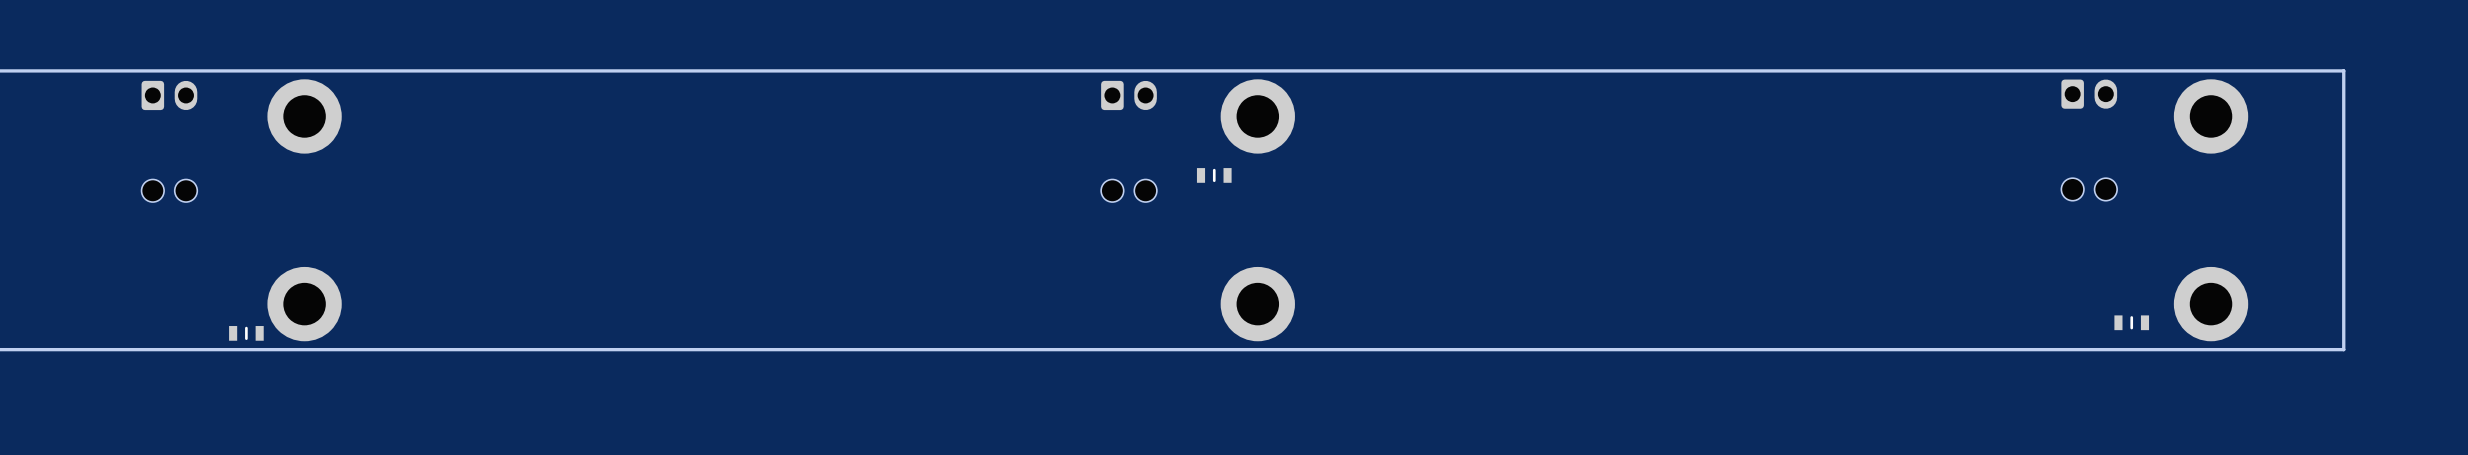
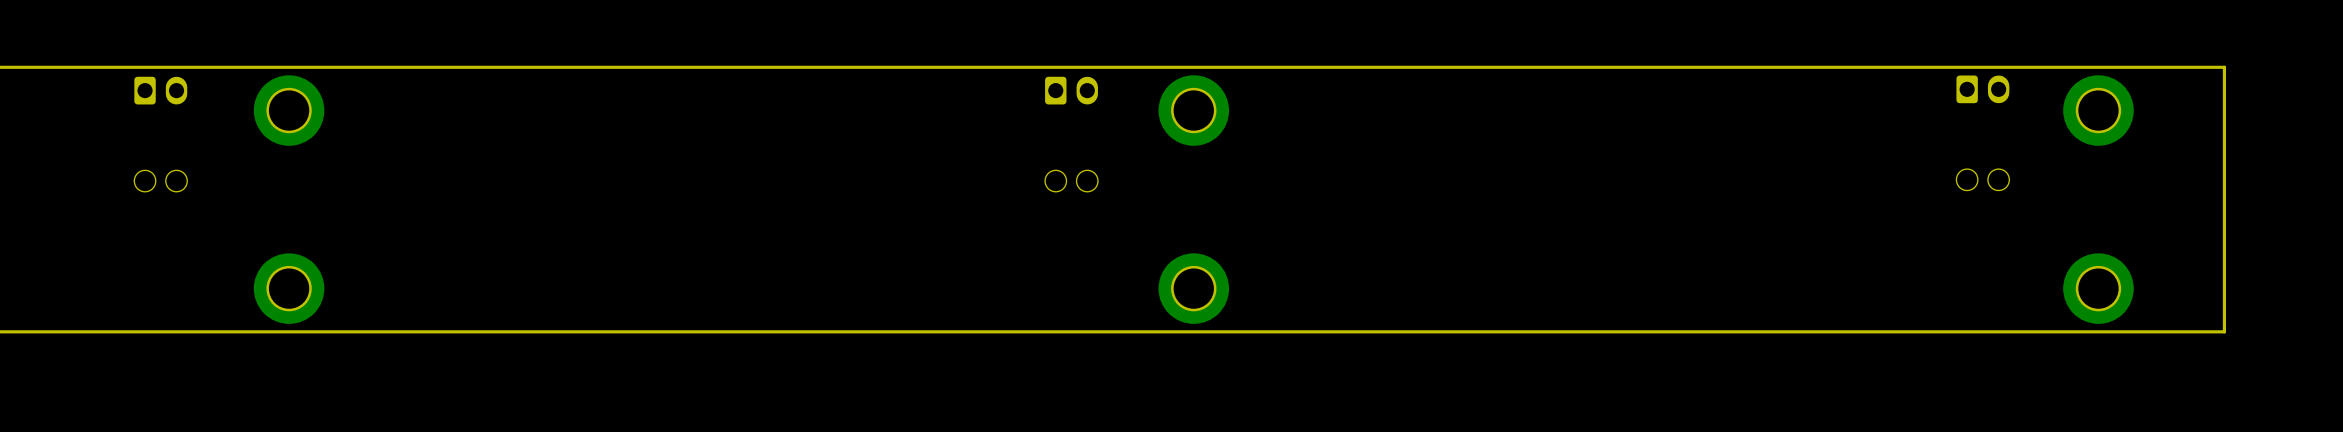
part: (1214, 175) -> none
part: (2131, 322) -> none
part: (246, 333) -> none

